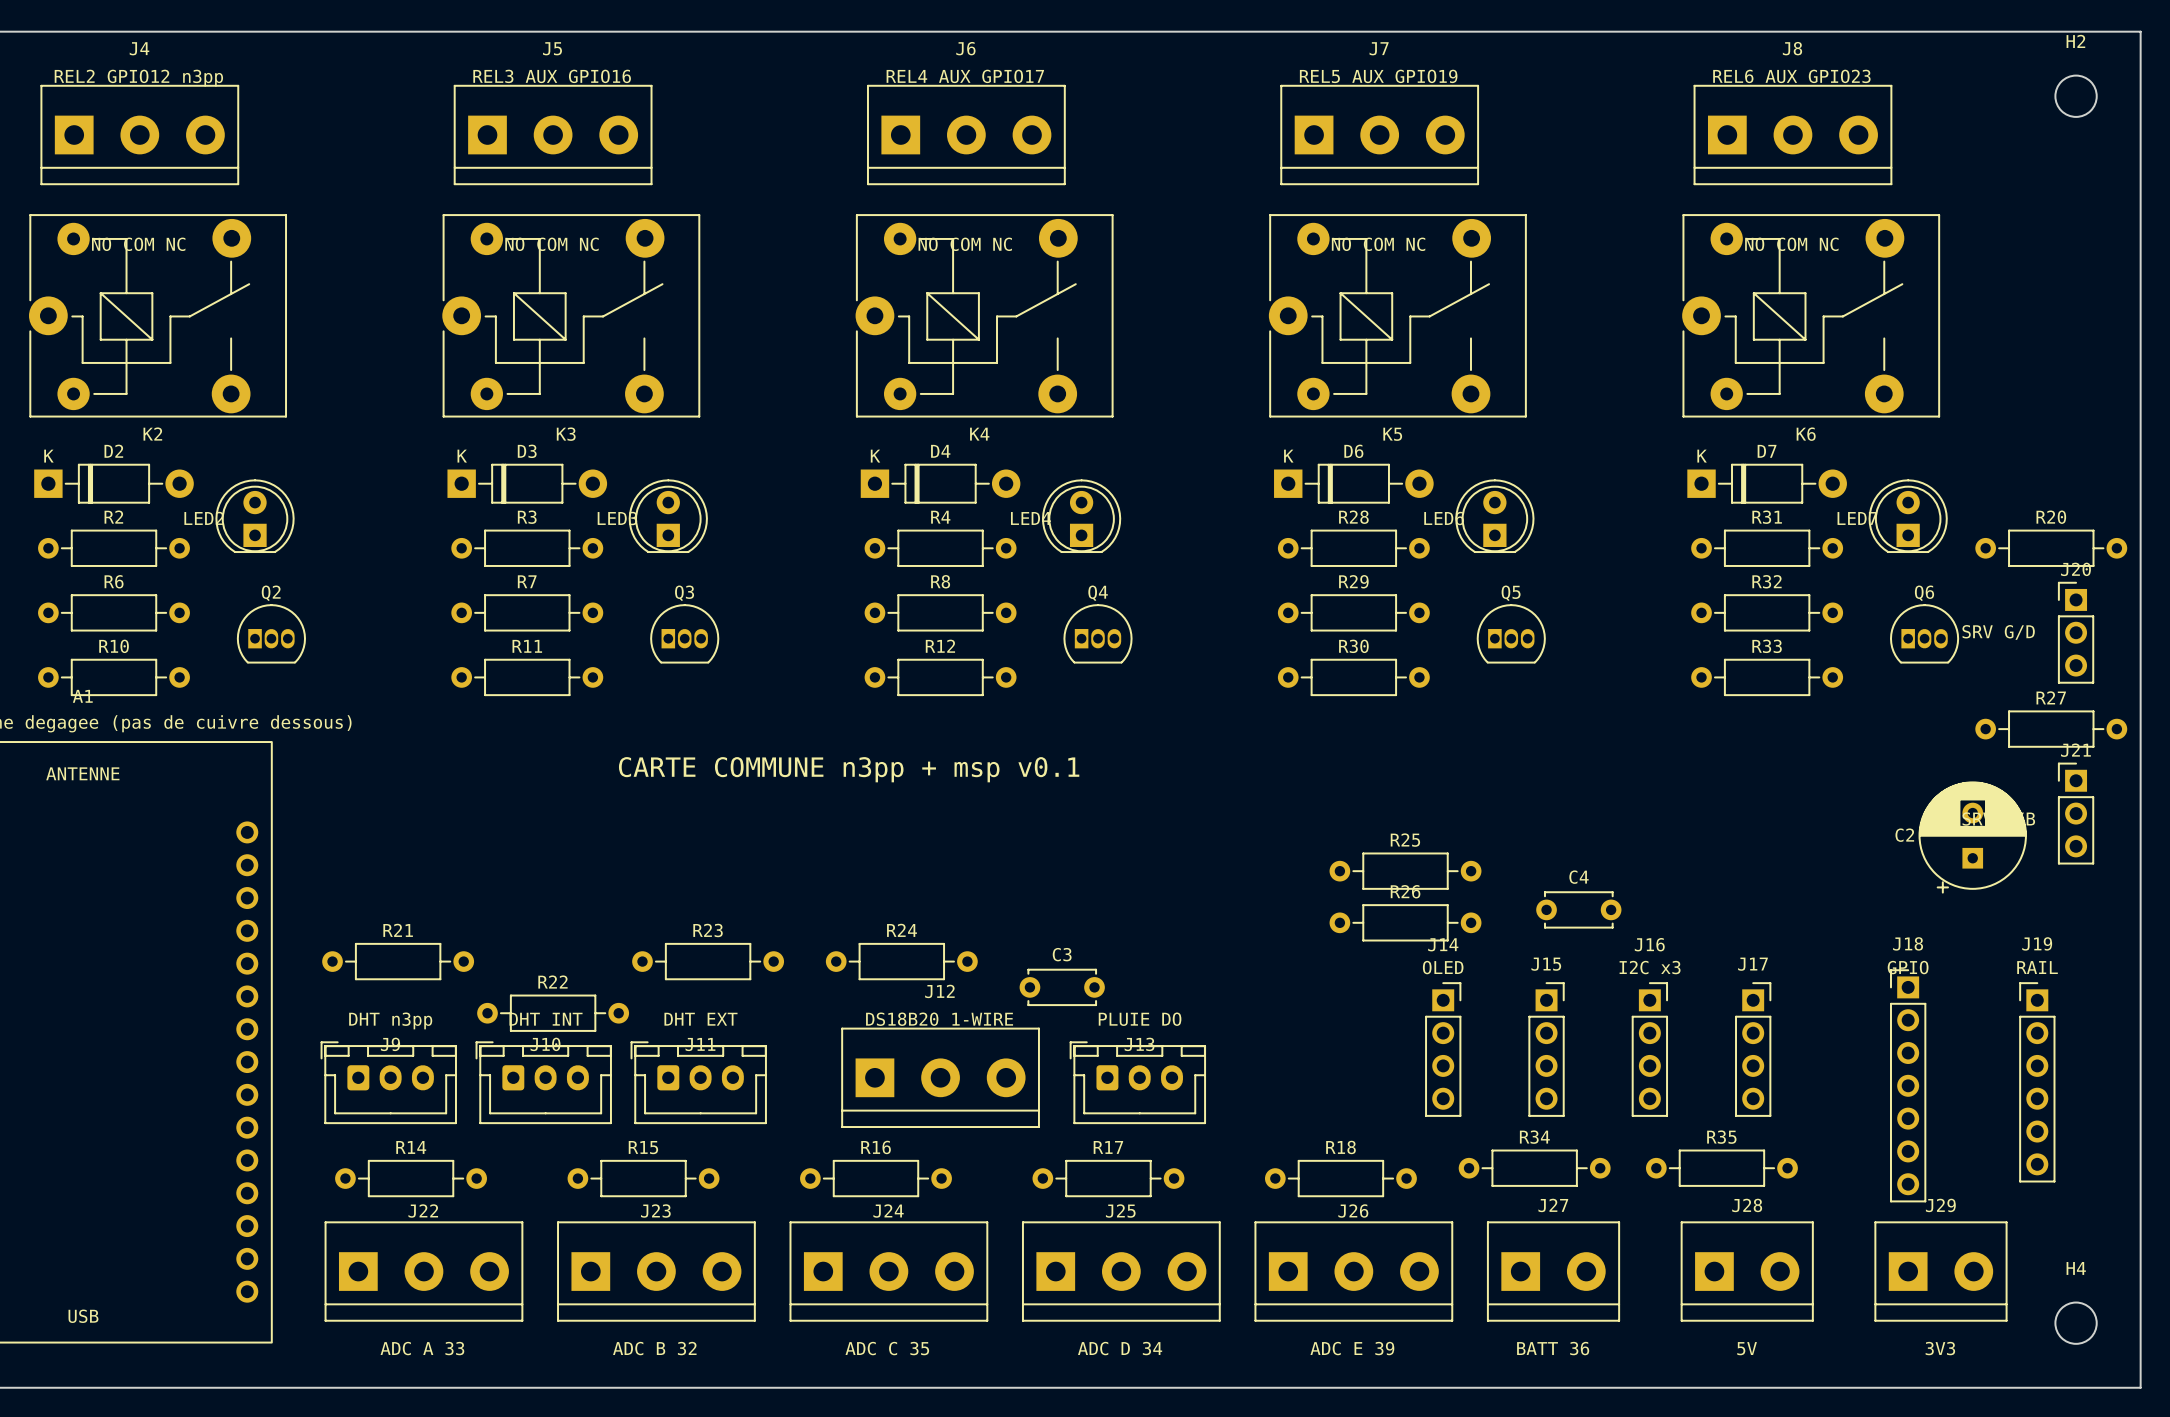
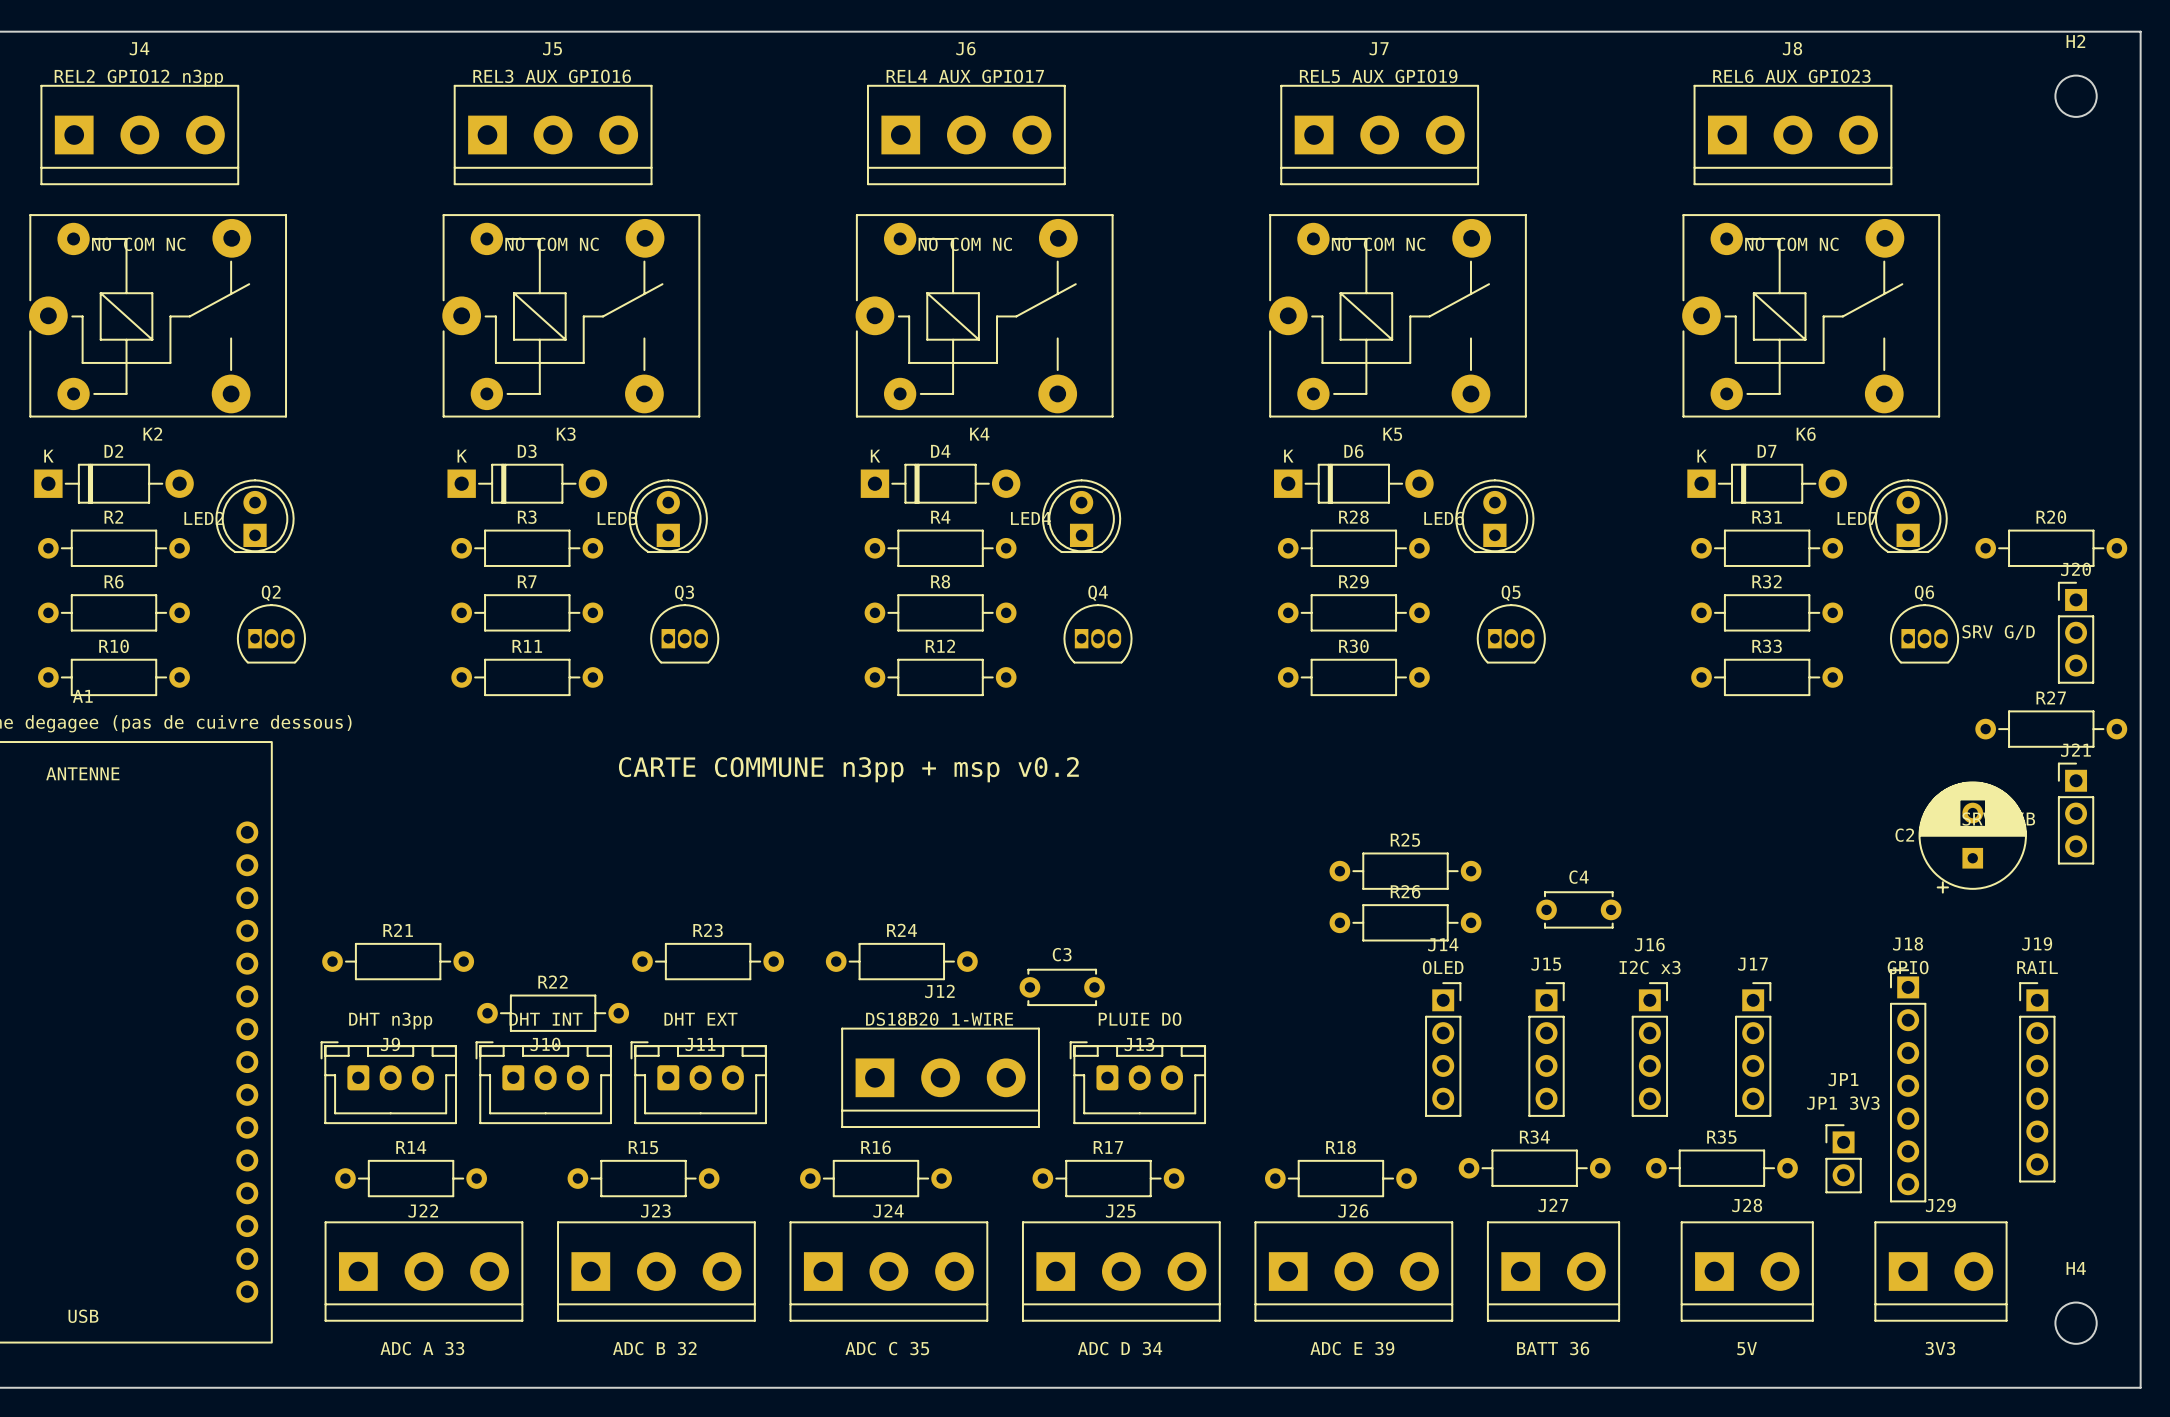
text: CARTE COMMUNE n3pp + msp v0.1 (849, 769) -> CARTE COMMUNE n3pp + msp v0.2 (848, 769)
text: none -> JP1 3V3 (1843, 1103)
JP1: none -> (1843, 1158)

